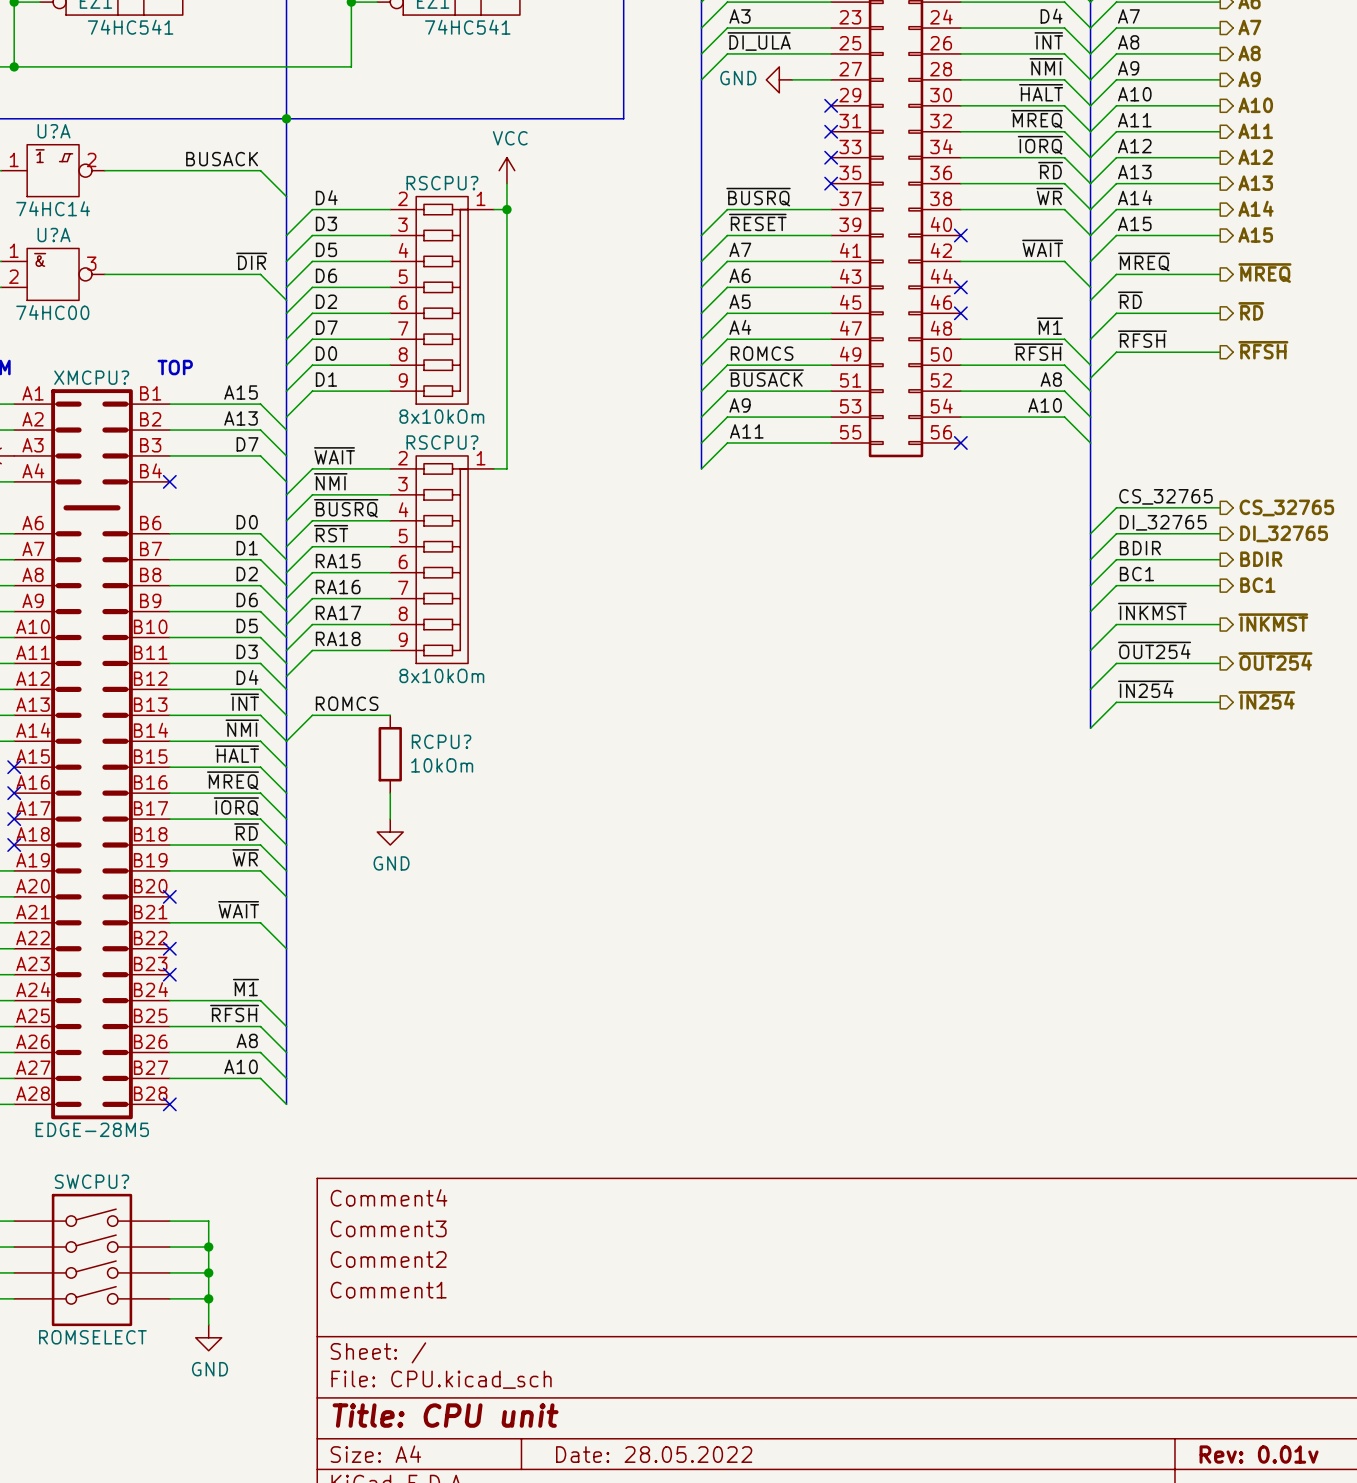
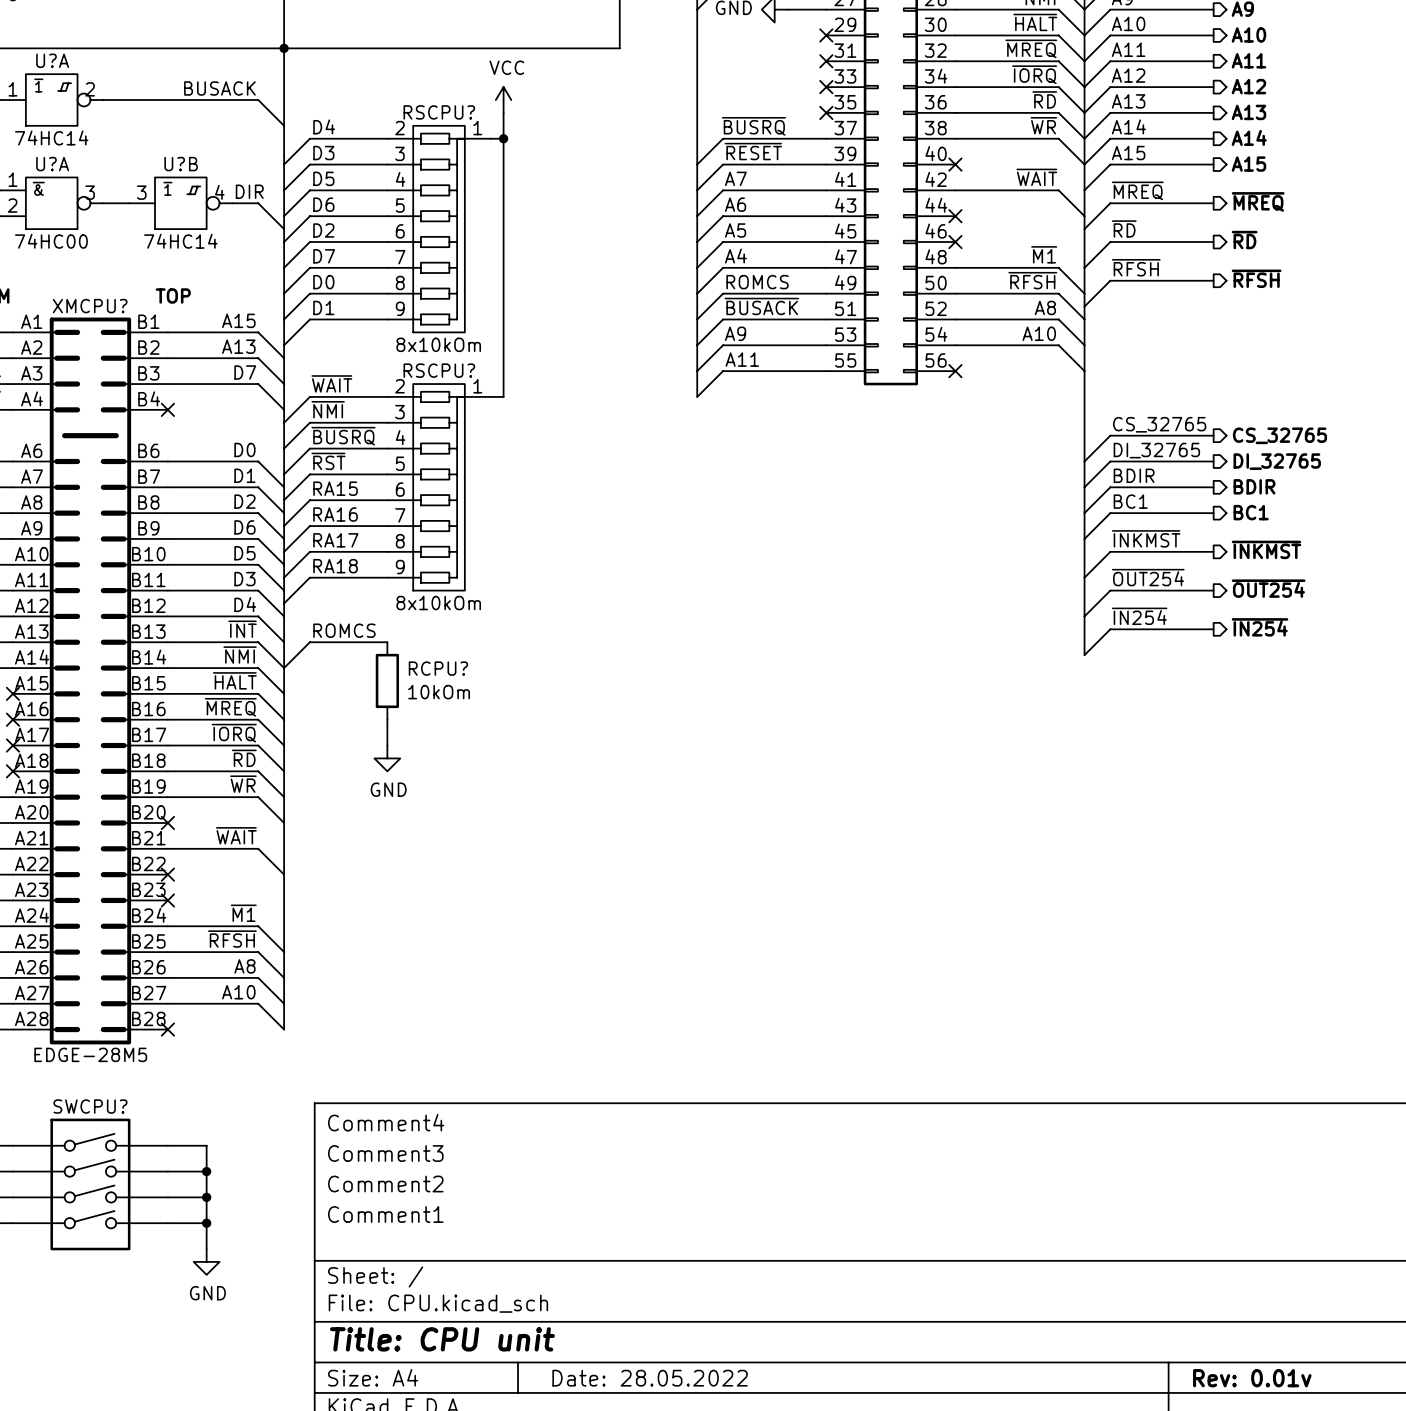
label: ~{DIR} (251, 261) -> DIR (249, 191)
wire: (130, 274) (234, 274) -> none
U?B: none -> 74HC14 (180, 203)
SWCPU? value: ROMSELECT (92, 1337) -> none

